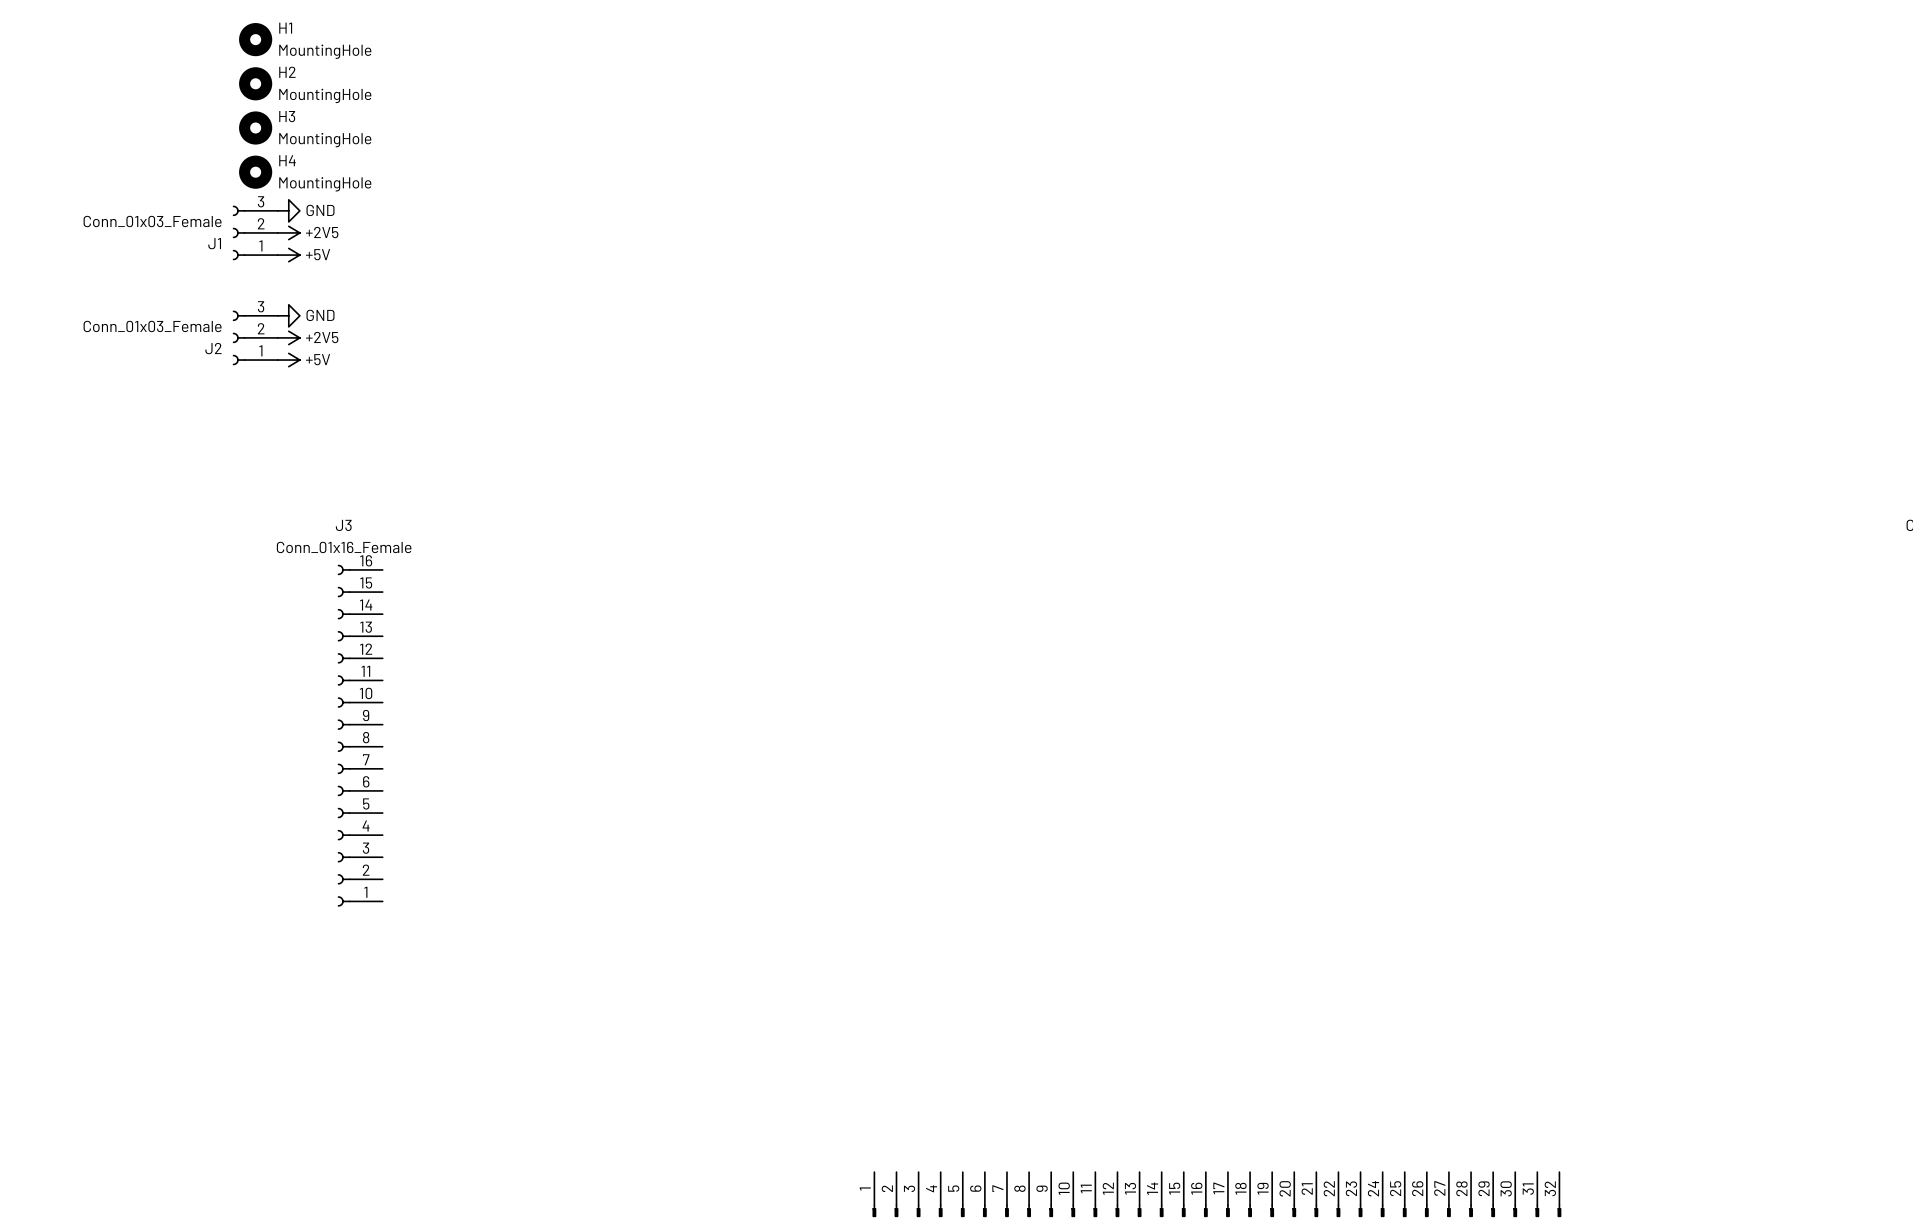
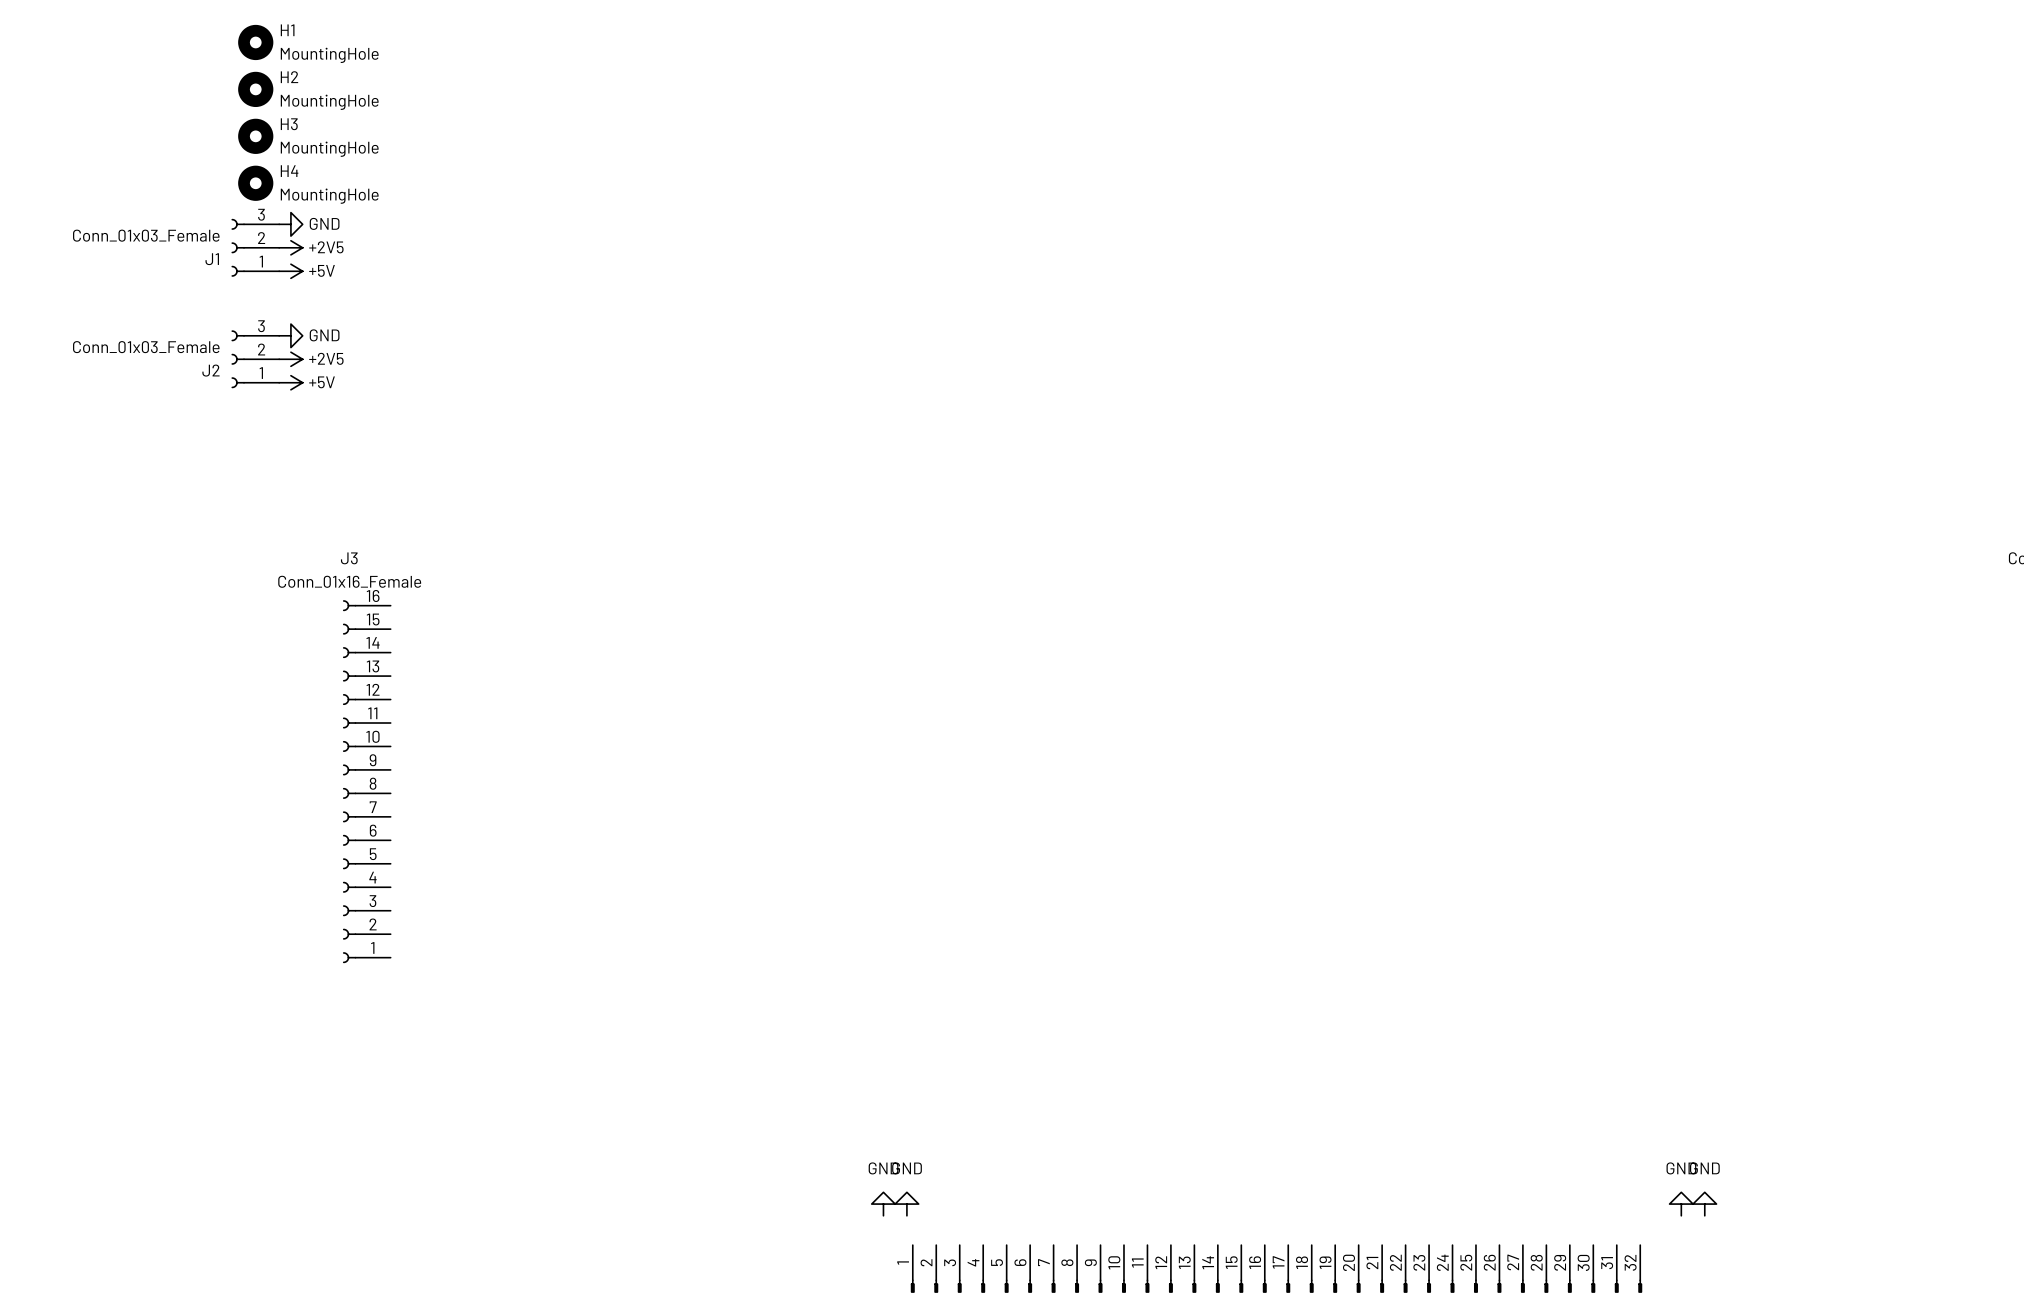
power symbol: none -> GND (883, 1204)
power symbol: none -> GND (906, 1204)
power symbol: none -> GND (1681, 1204)
power symbol: none -> GND (1704, 1204)

